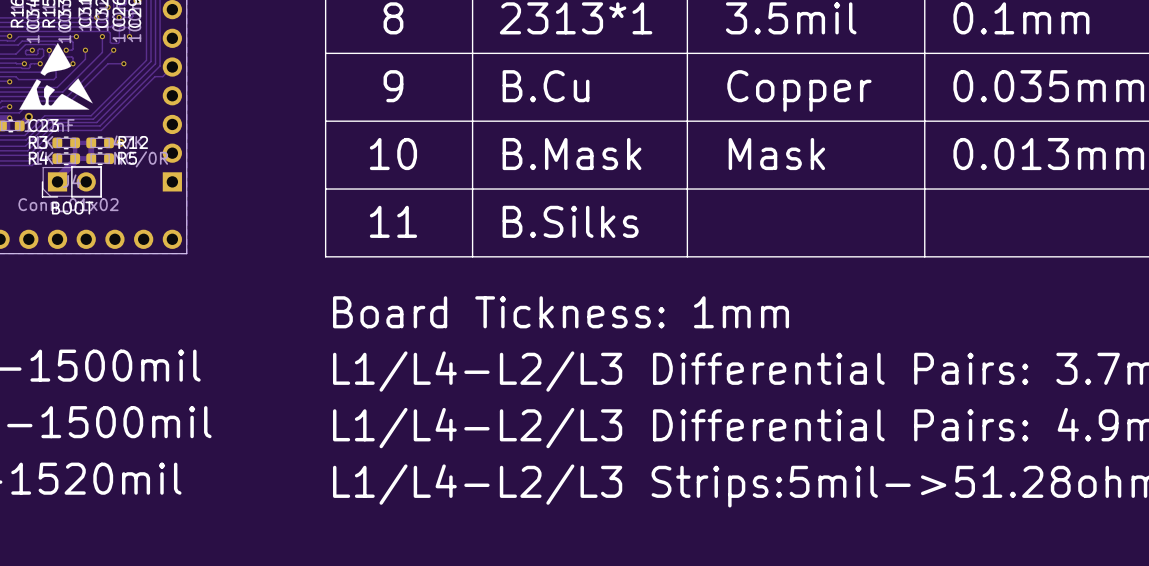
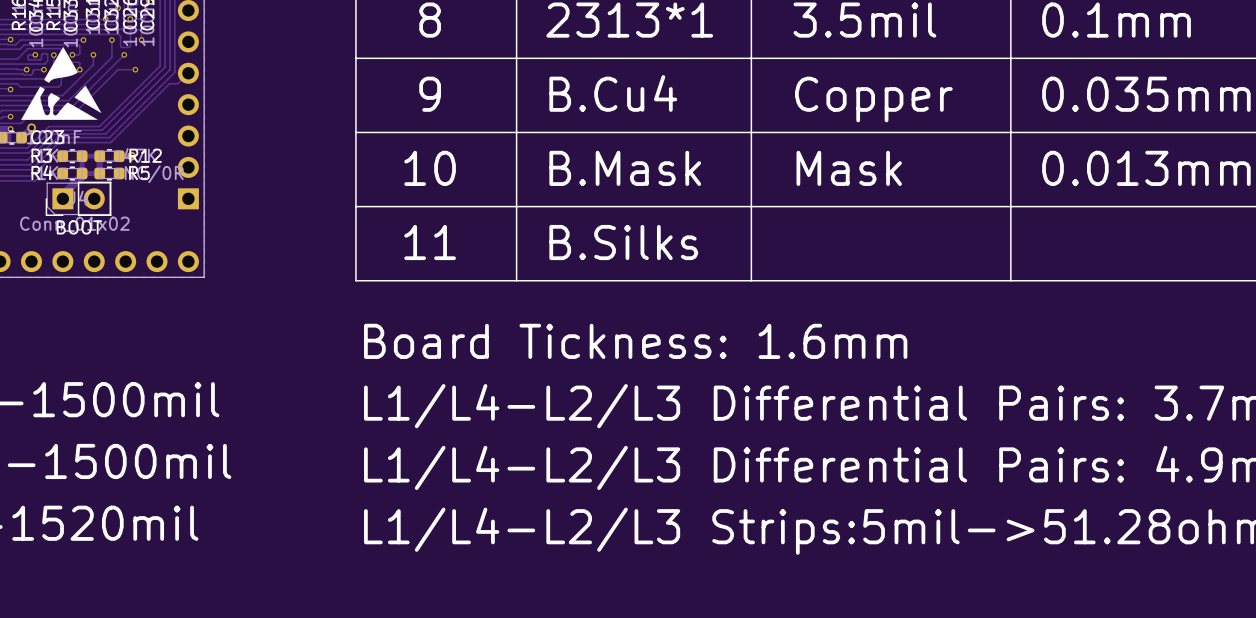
text: B.Cu (546, 86) -> B.Cu4 (613, 93)
text: Board Tickness: 1mm (561, 312) -> Board Tickness: 1.6mm (635, 341)

